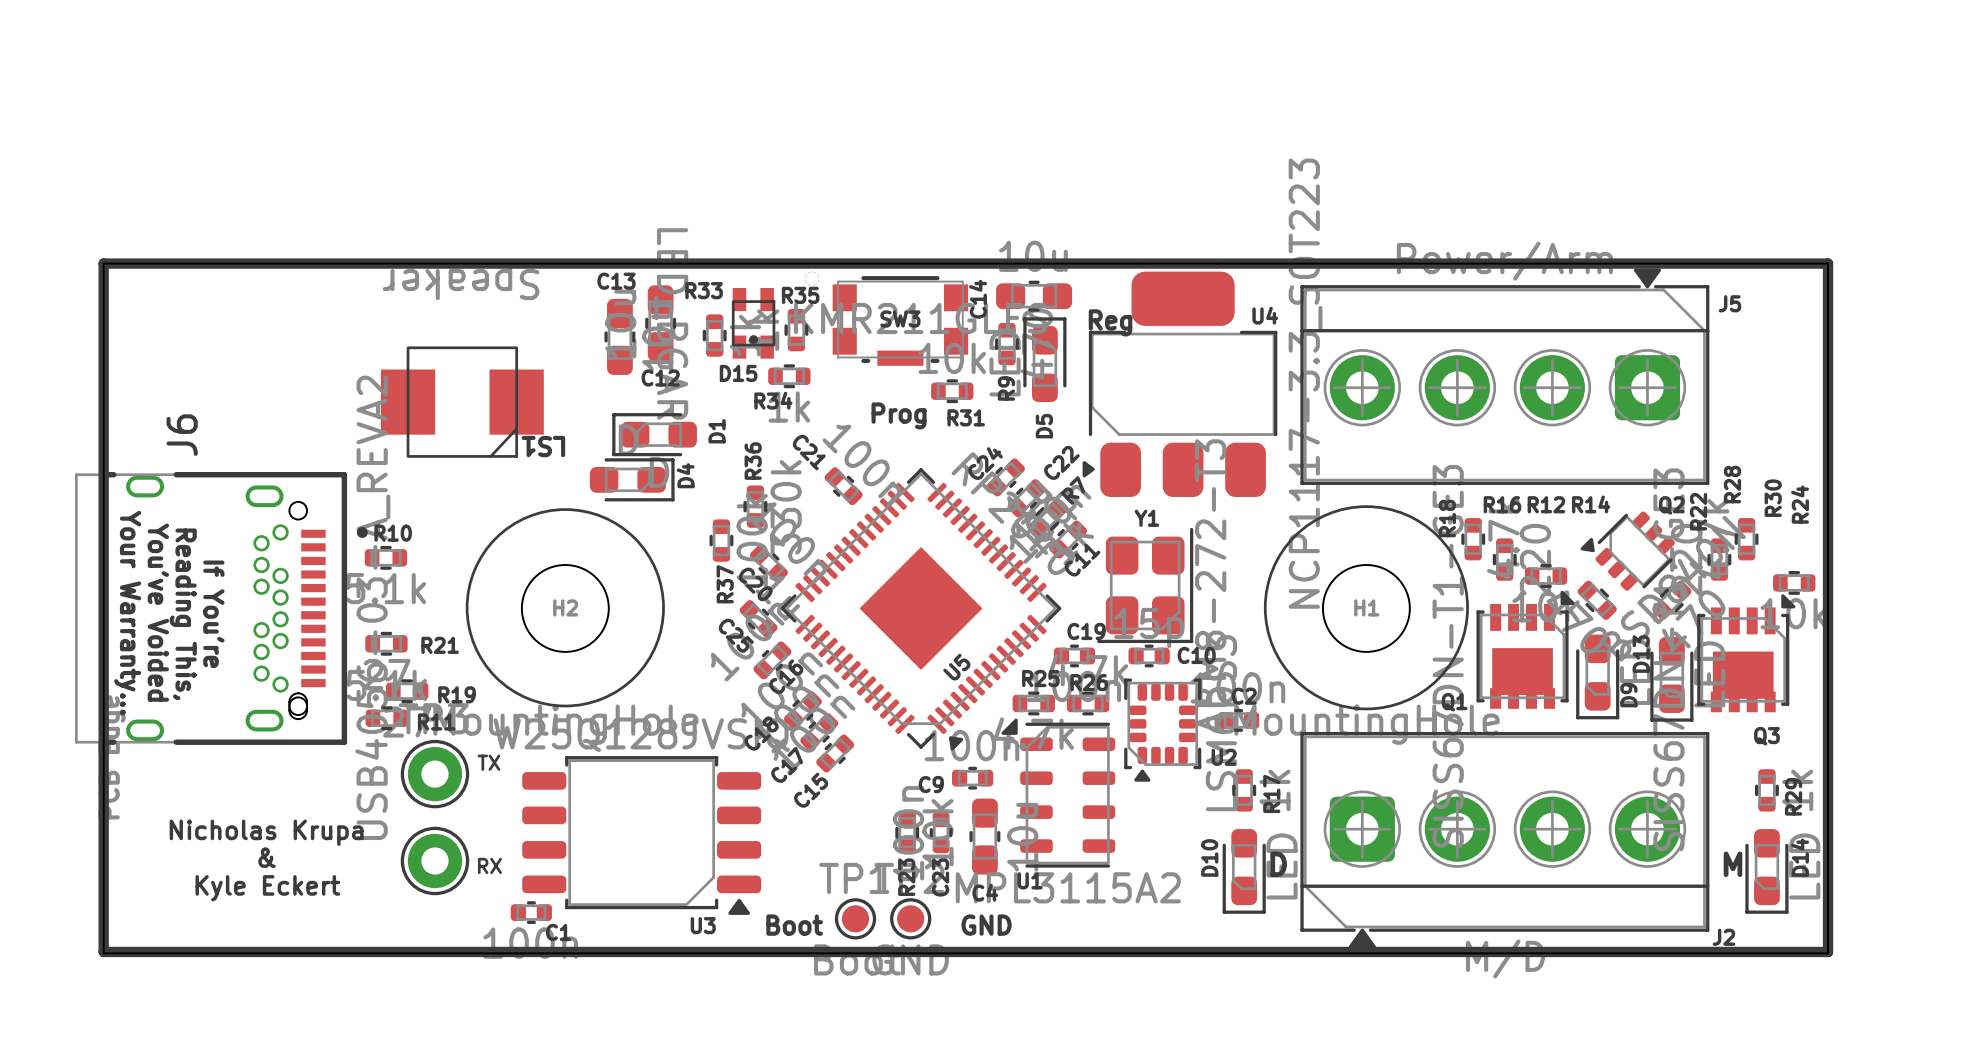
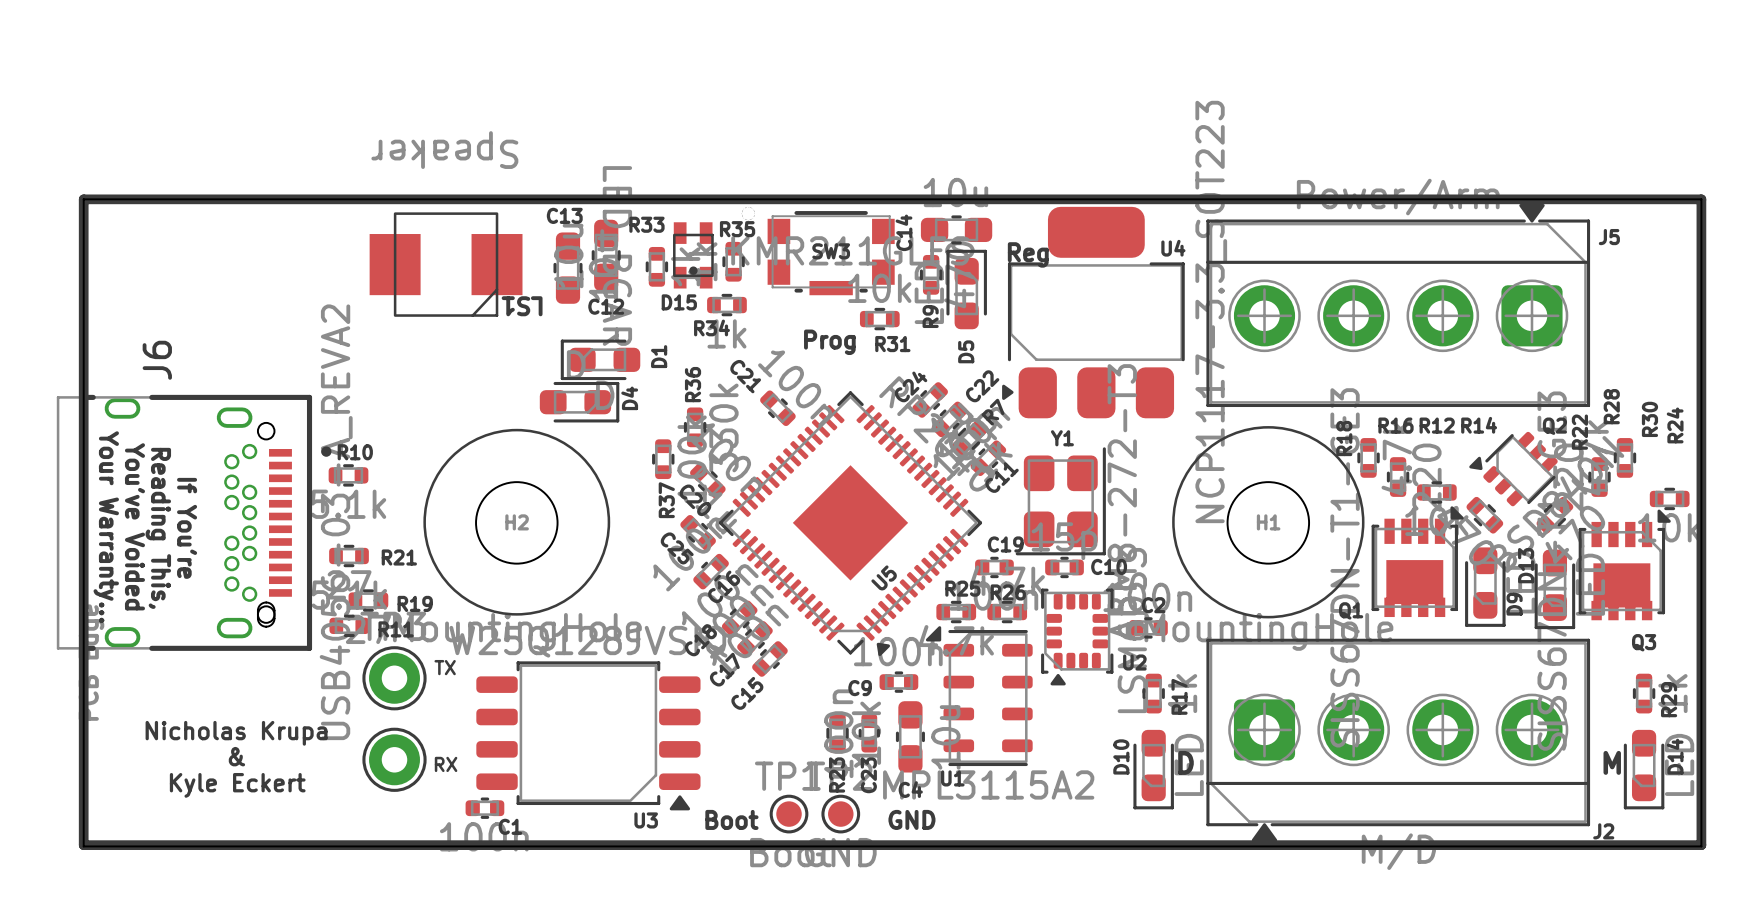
LS1 position: (462, 402) -> (446, 264)

